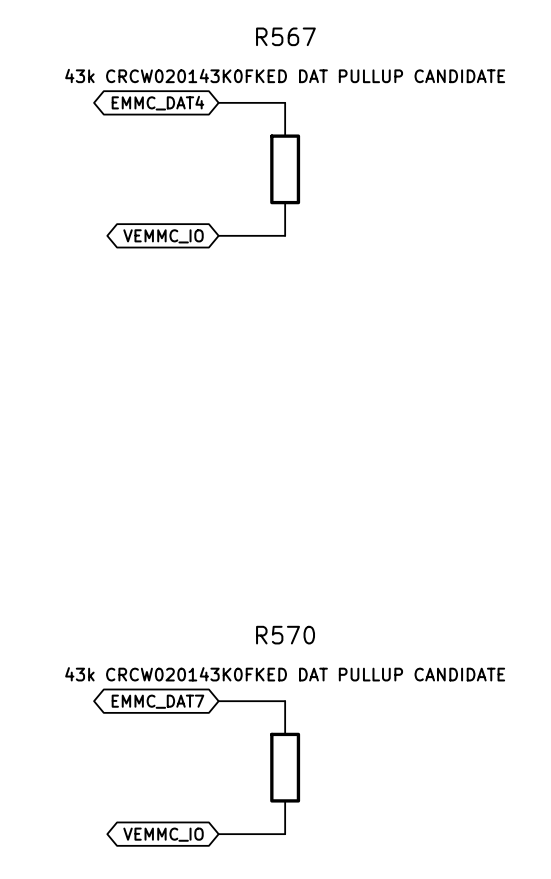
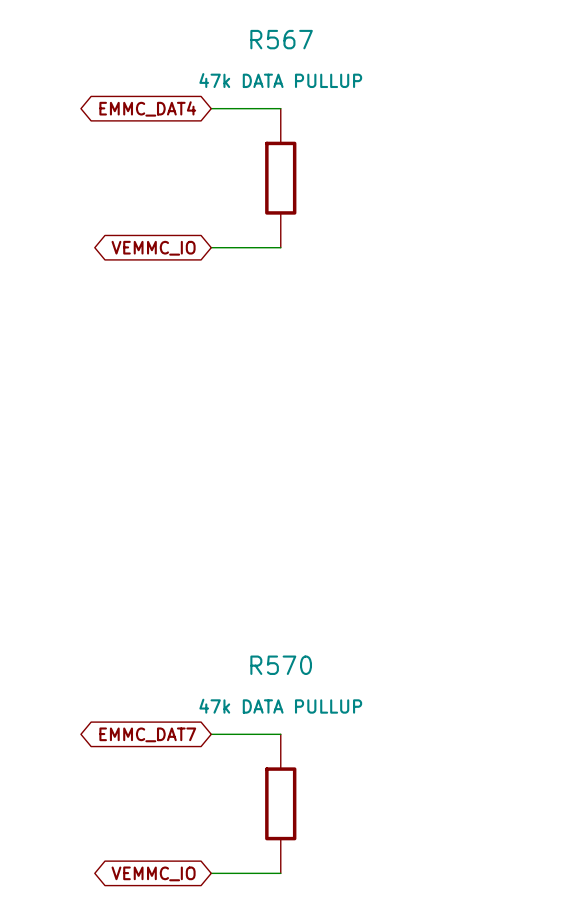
R567 value: 43k CRCW020143K0FKED DAT PULLUP CANDIDATE (285, 75) -> 47k DATA PULLUP (280, 80)
R570 value: 43k CRCW020143K0FKED DAT PULLUP CANDIDATE (285, 674) -> 47k DATA PULLUP (280, 706)

